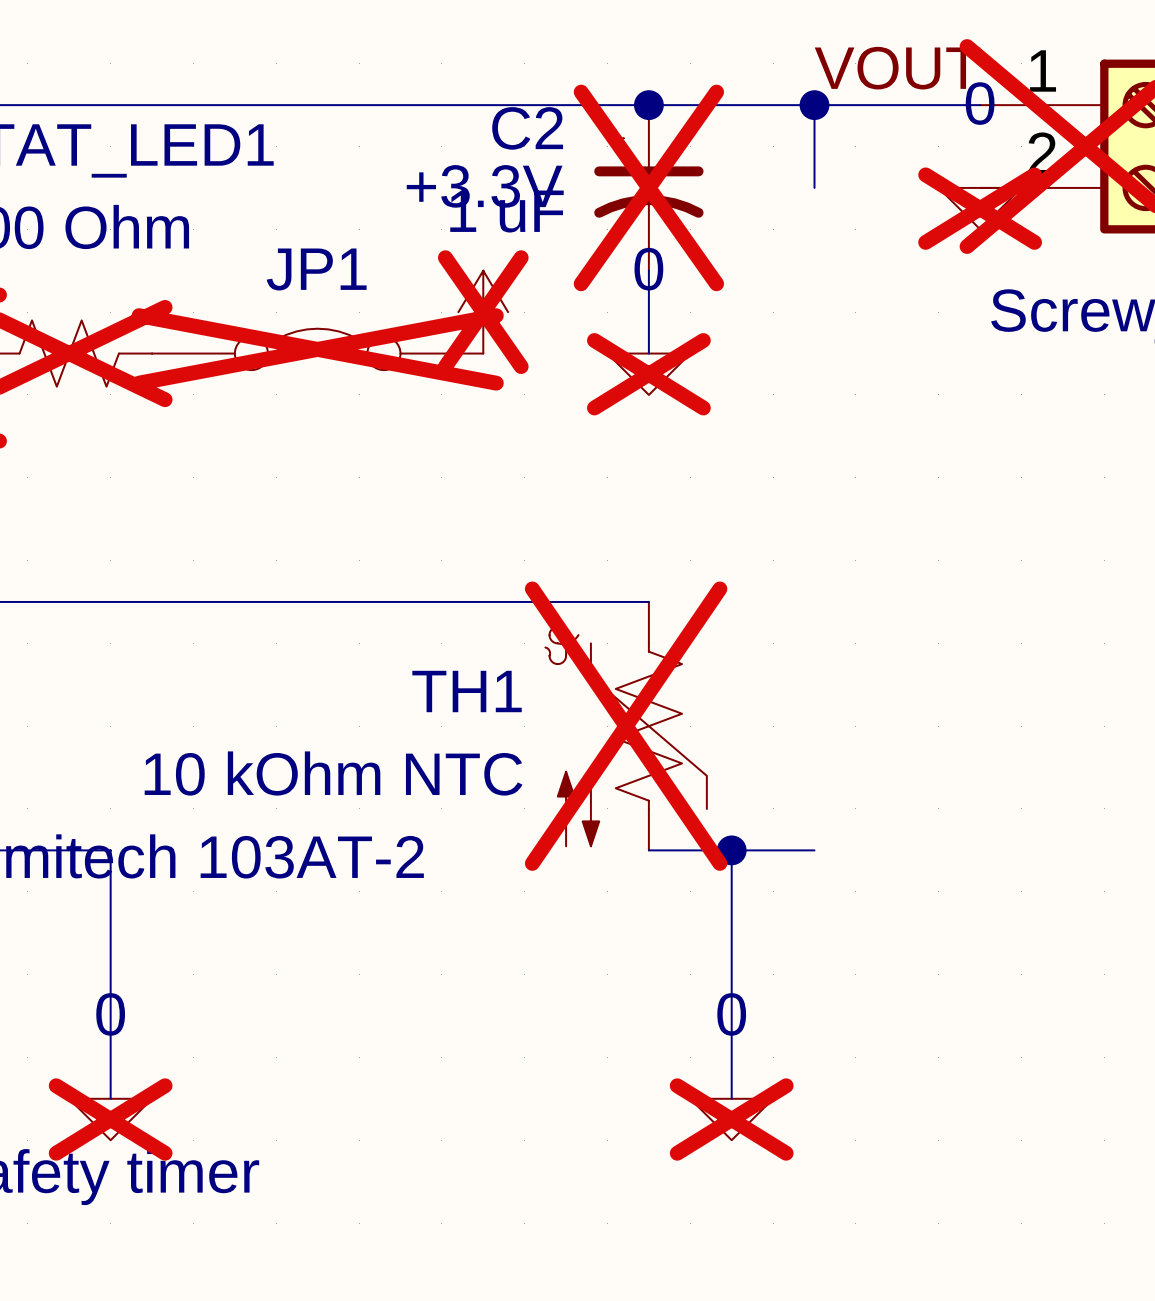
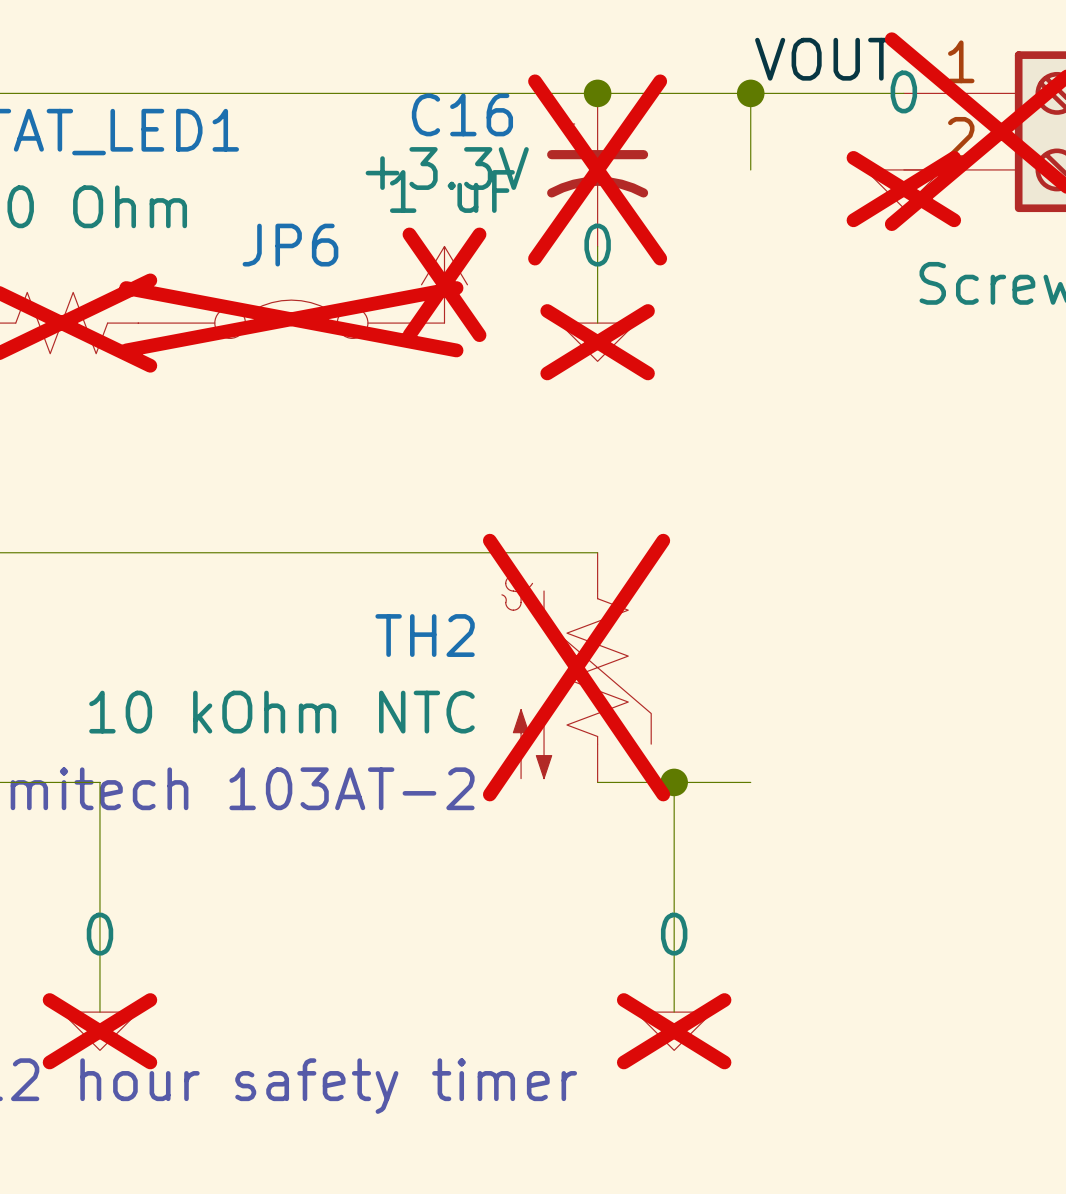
C2 name: C2 (527, 128) -> C16 (462, 114)
JP1 name: JP1 (316, 269) -> JP6 (290, 245)
TH1 name: TH1 (467, 691) -> TH2 (425, 635)

